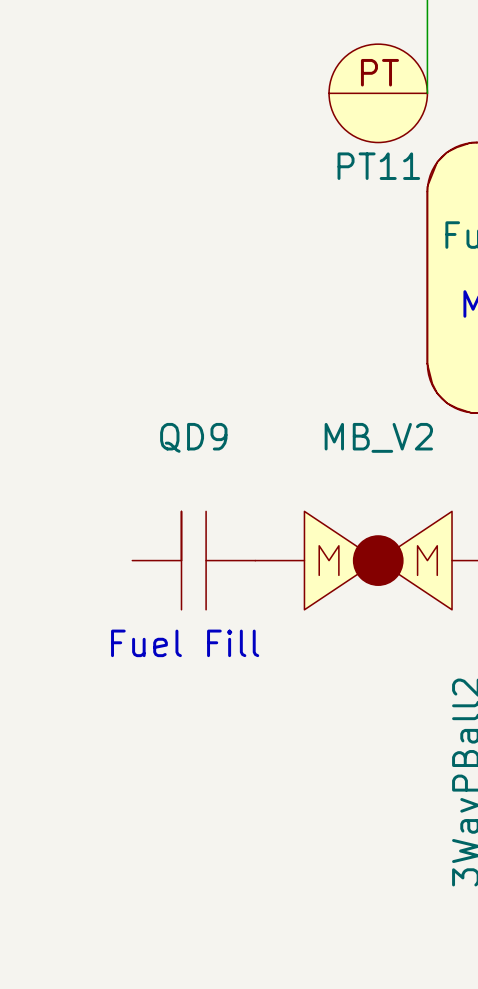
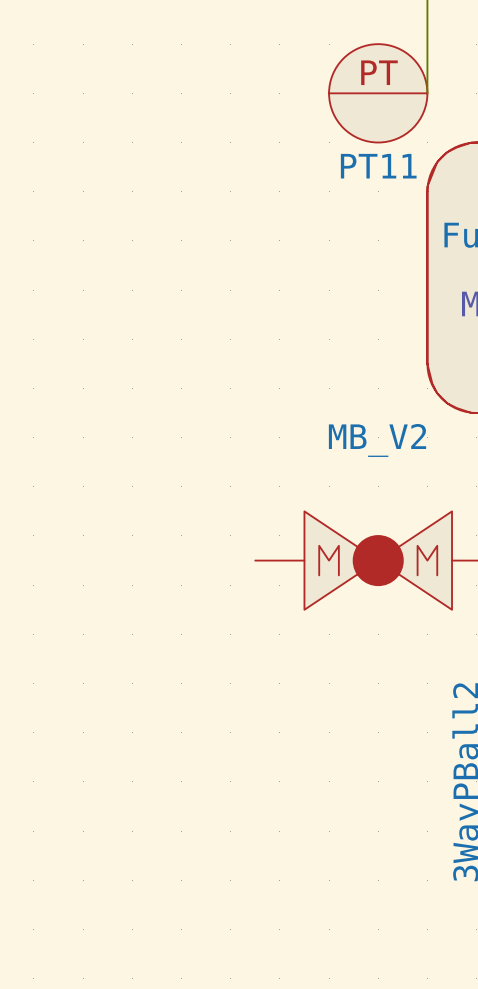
QD9: (193, 560) -> none
text: Fuel Fill (185, 643) -> none

